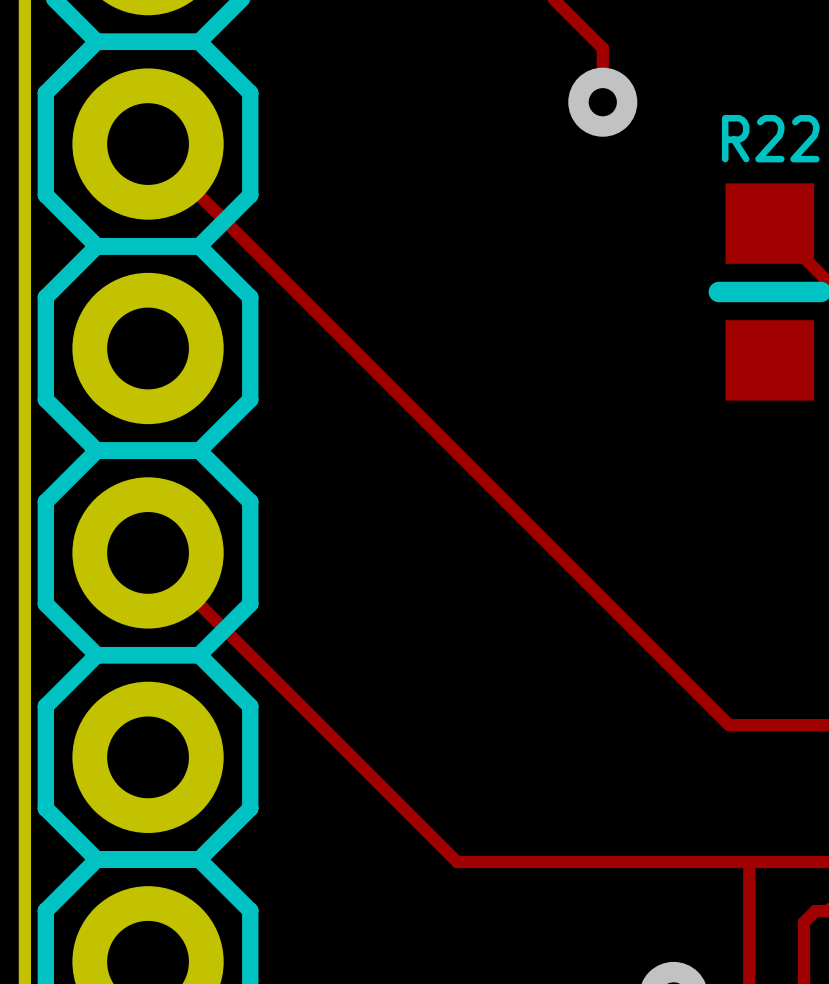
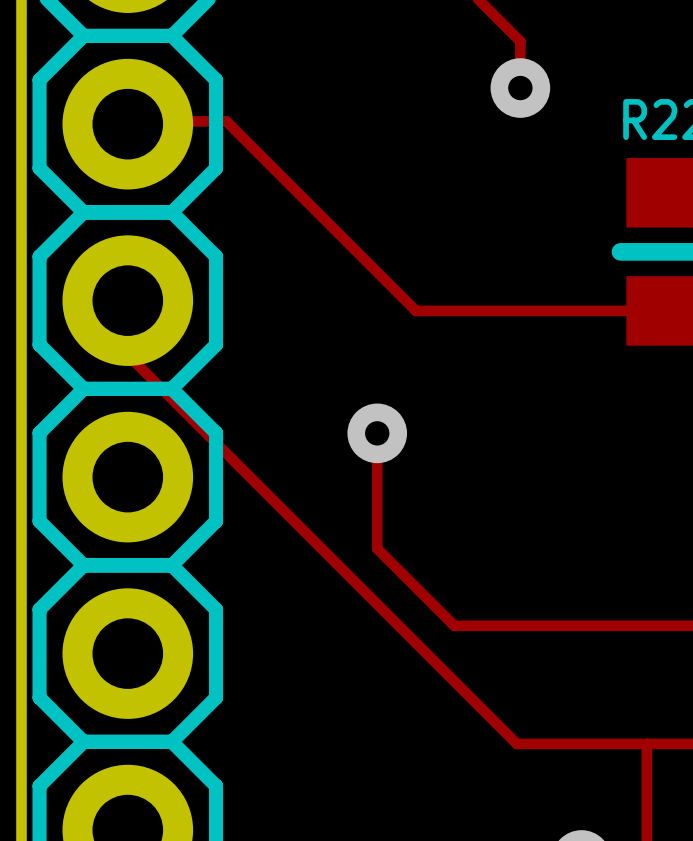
track: (148, 144) (729, 725) -> (127, 121) (226, 121) (416, 310) (664, 310)
track: none -> (377, 433) (377, 548) (454, 625) (629, 625)
via: none -> (377, 433)
track: (148, 552) (457, 861) (598, 861) -> (130, 299) (130, 357) (516, 743)

